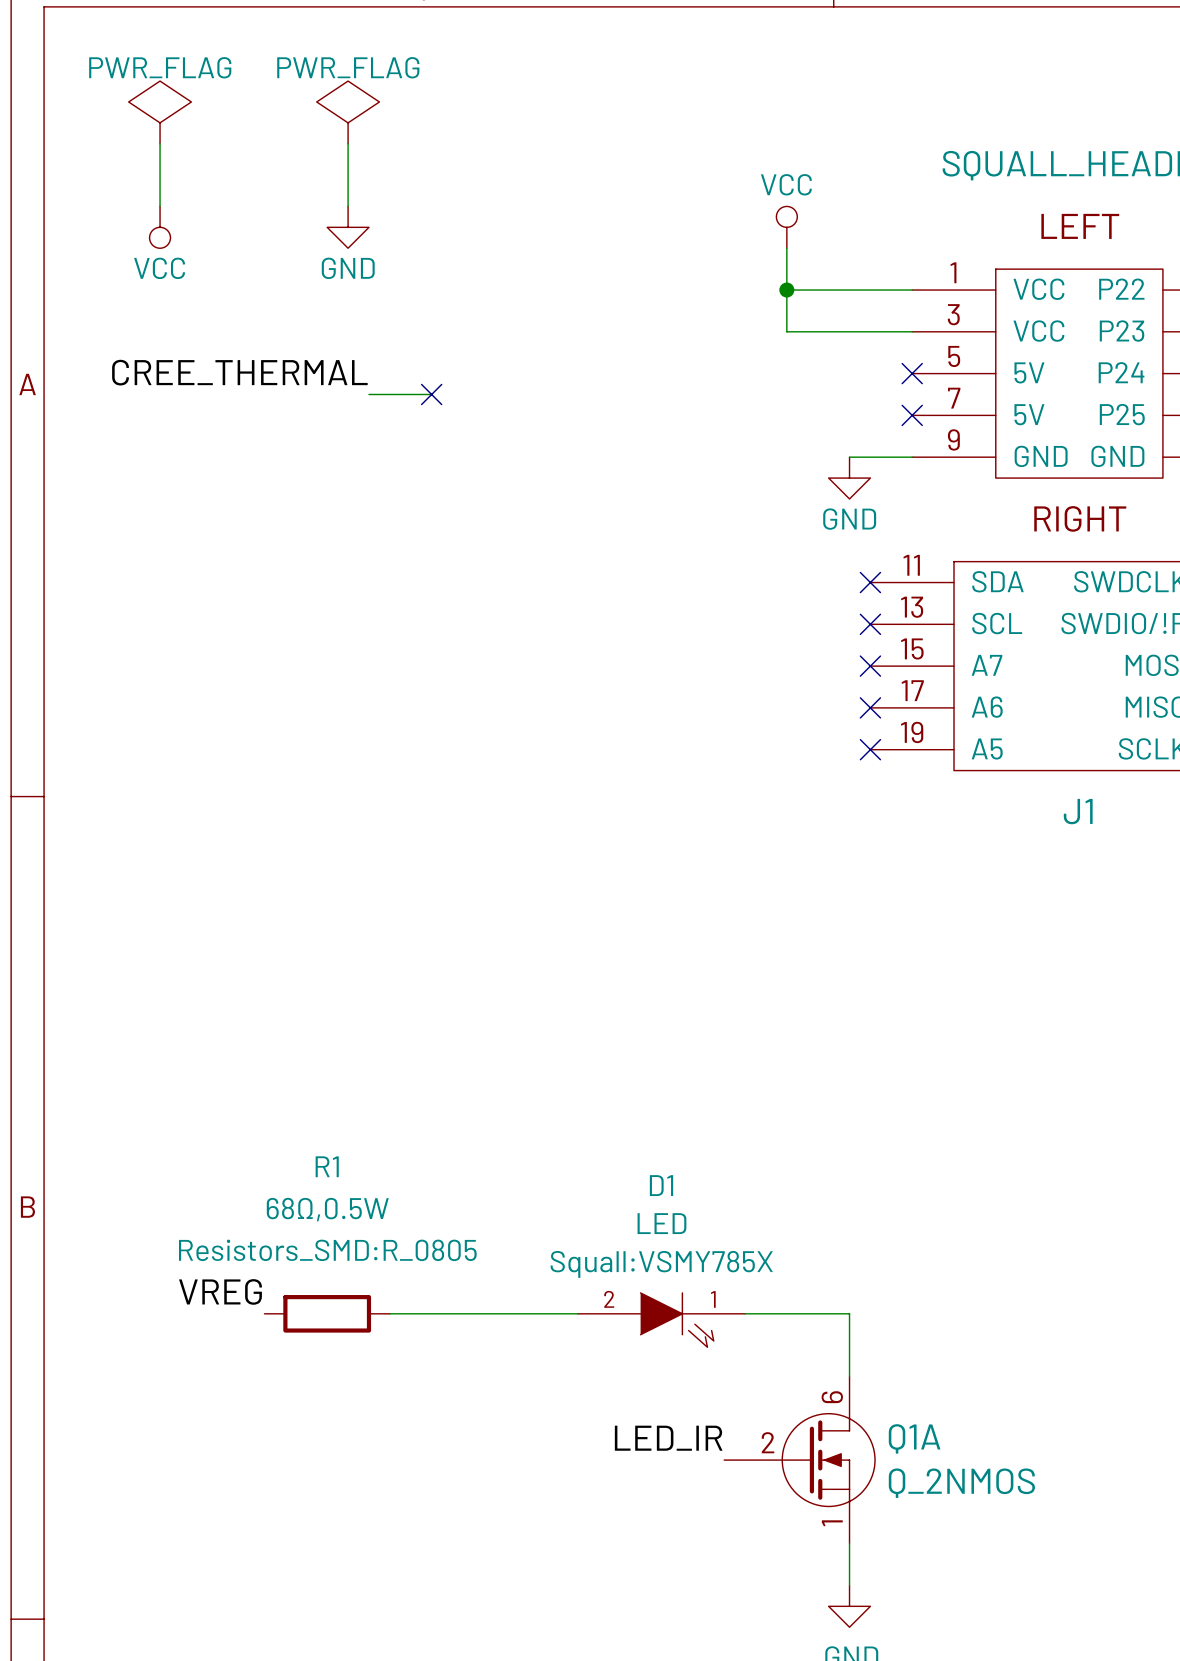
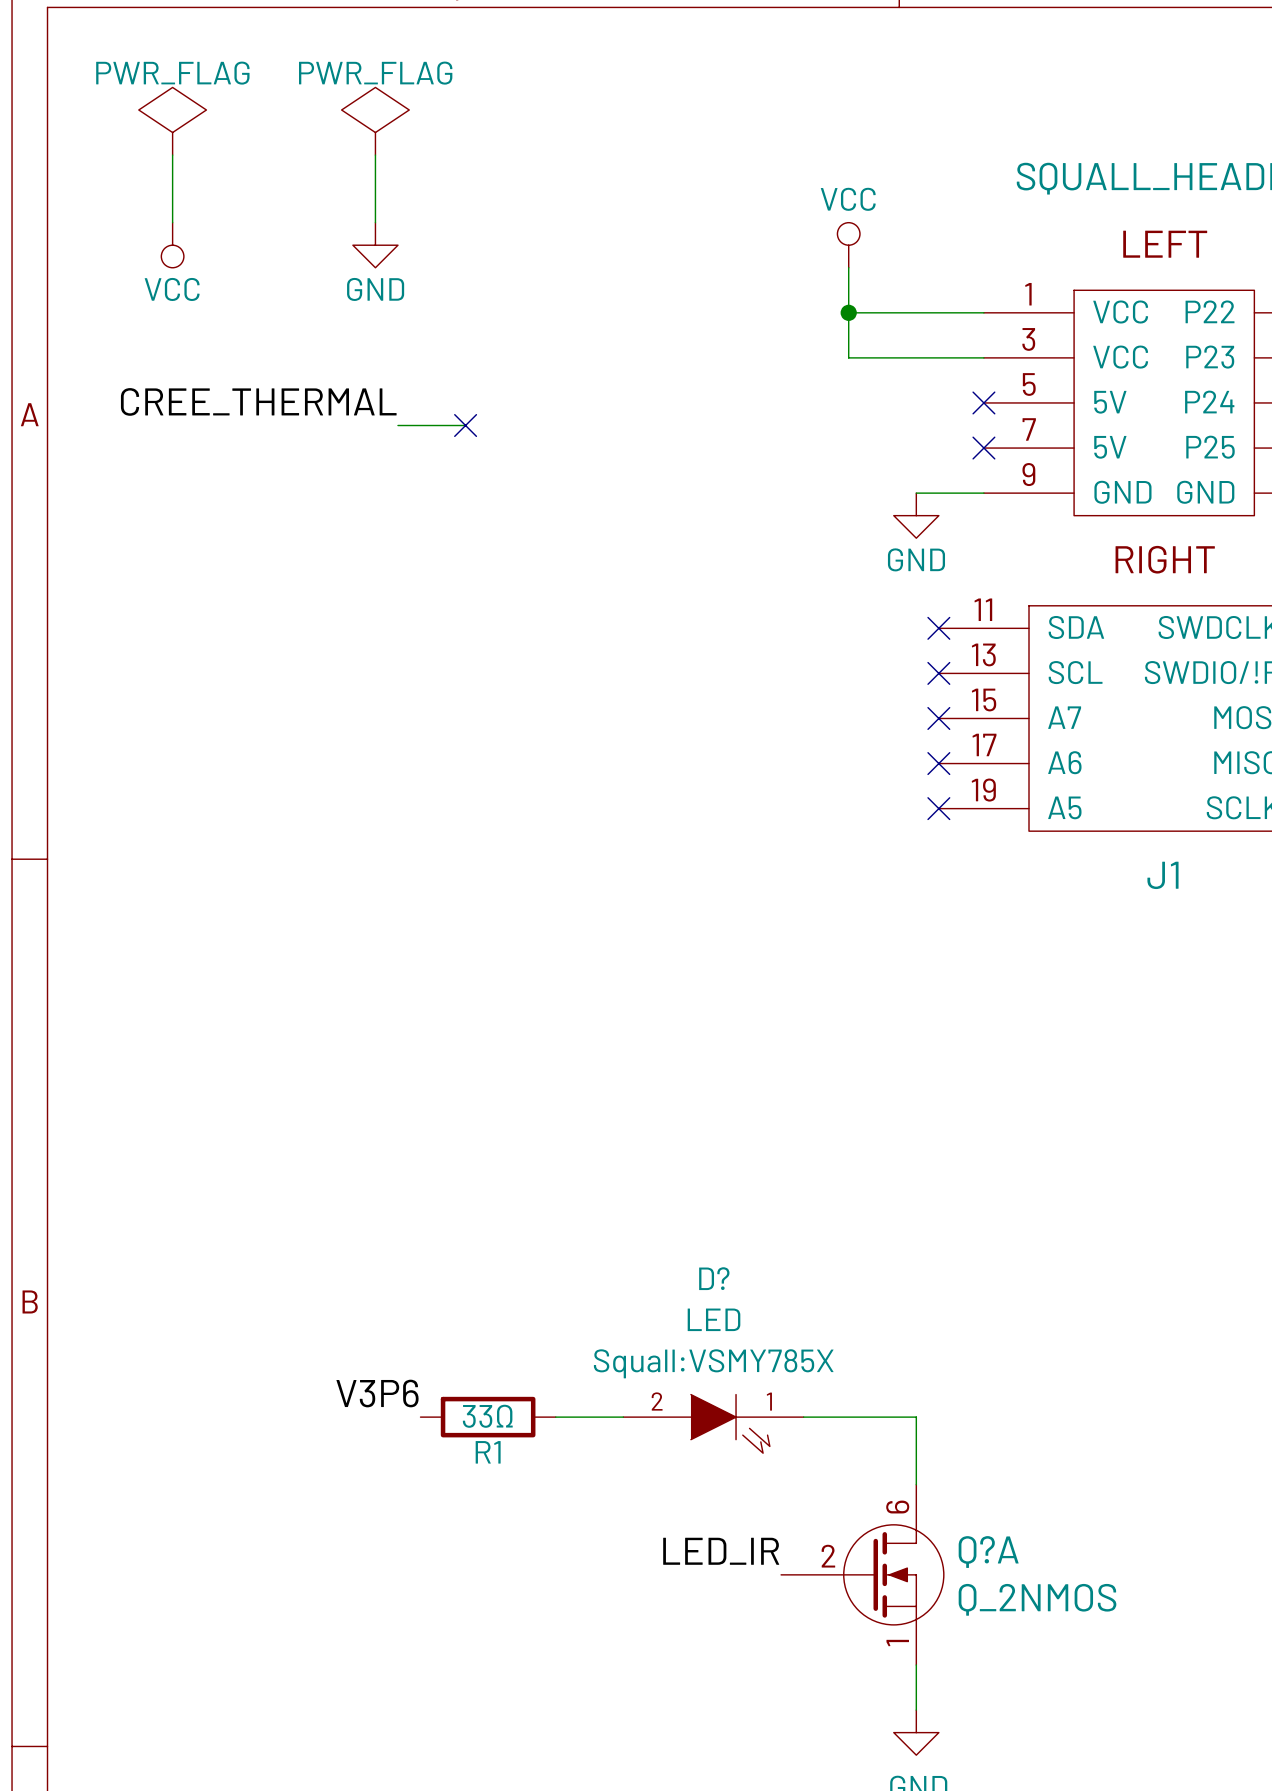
R1 name position: R1 (327, 1166) -> R1 (488, 1452)
D1 name: D1 (661, 1185) -> D? (714, 1278)
R1 value: 68Ω,0.5W (327, 1209) -> 33Ω (487, 1416)
R1 text: Resistors_SMD:R_0805 (327, 1250) -> none
label: VREG (220, 1291) -> none
label: none -> V3P6 (377, 1393)
R1 position: (327, 1313) -> (488, 1417)
wire: (389, 1313) (515, 1313) -> none
Q1A name: Q1A (914, 1438) -> Q?A (988, 1552)

